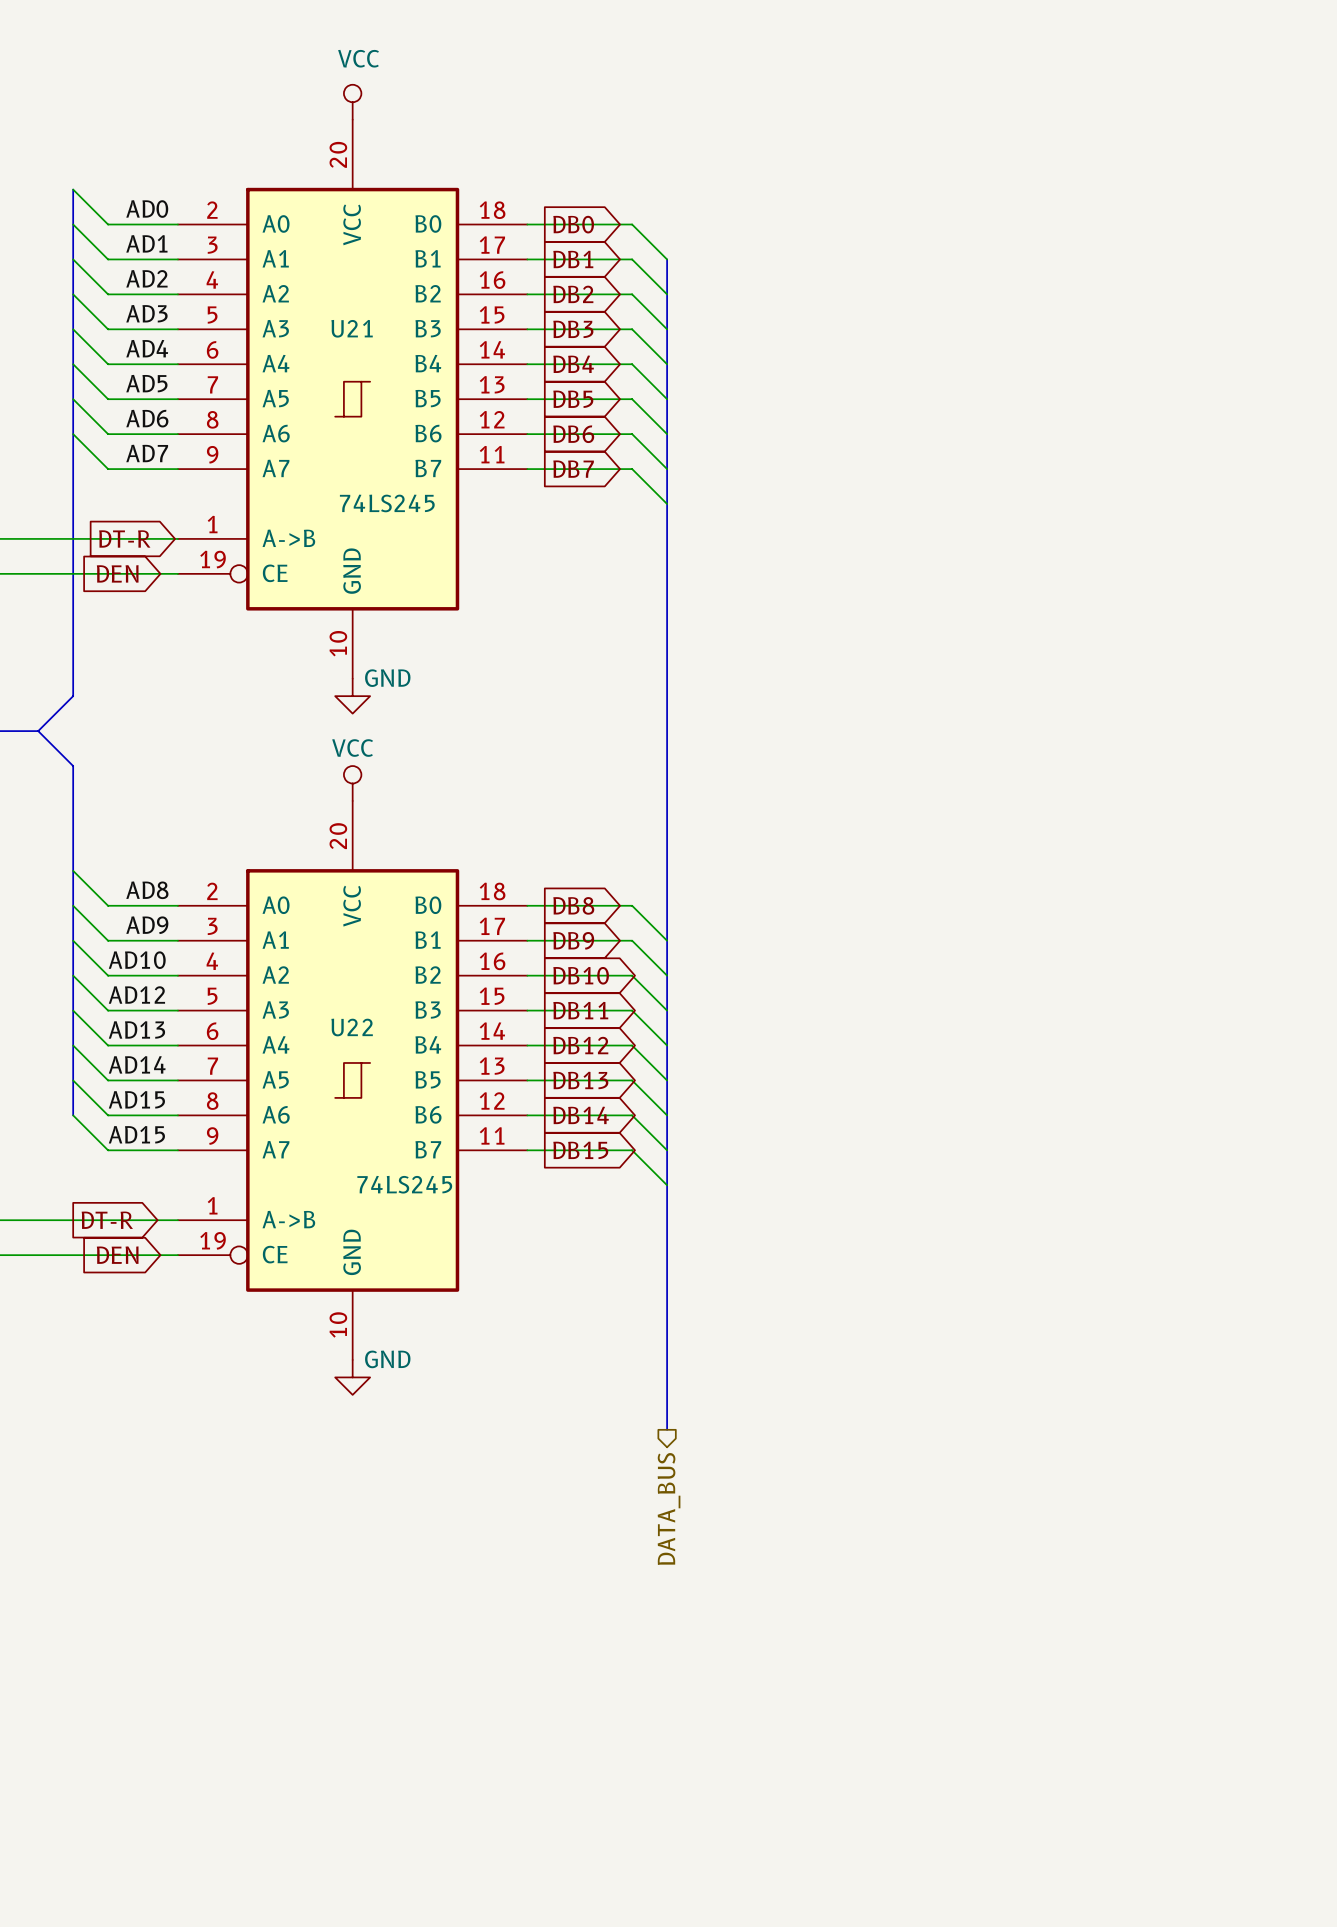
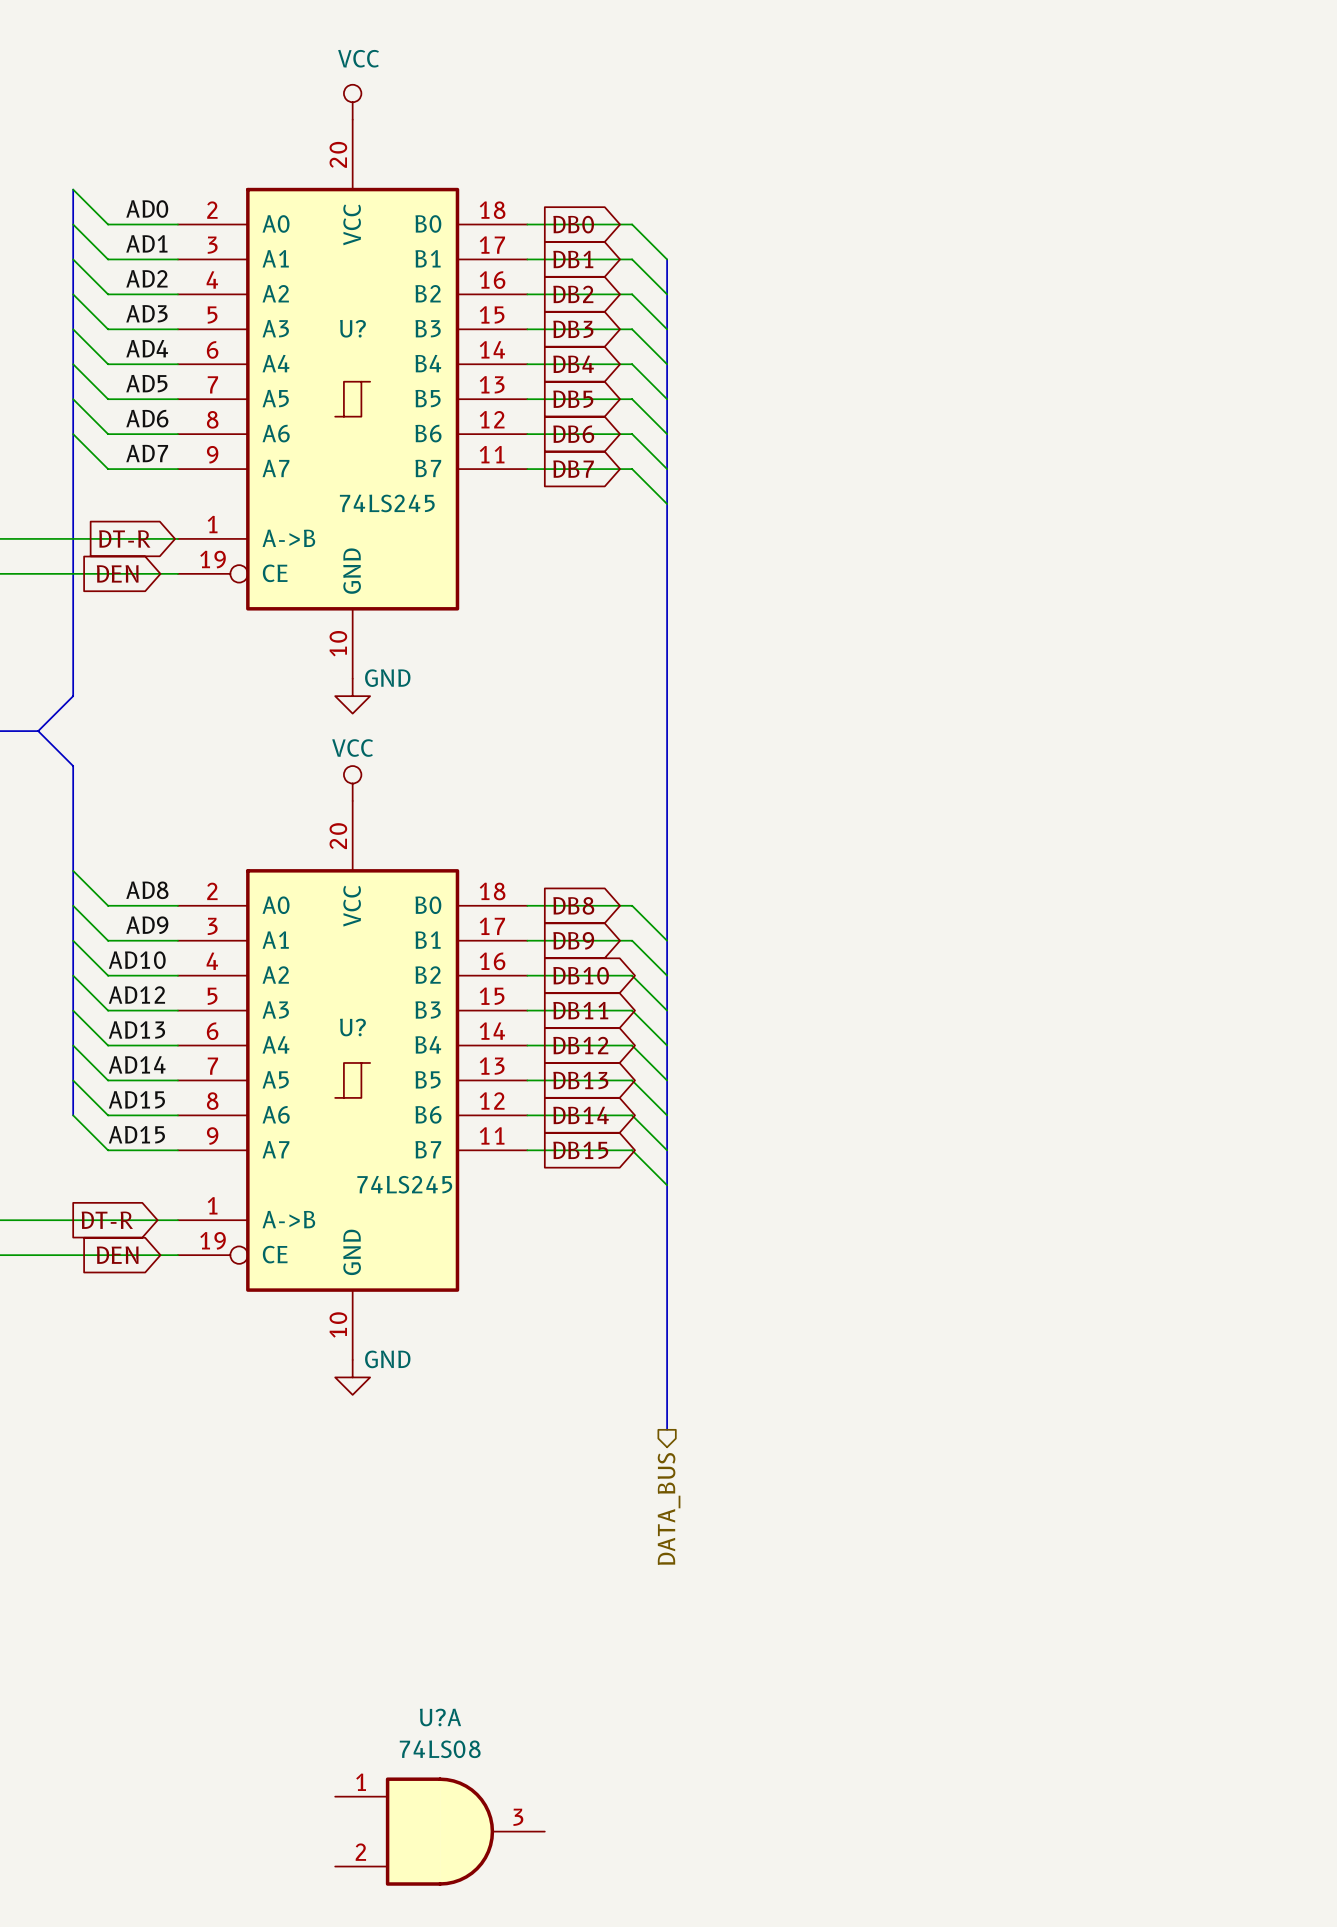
U21 name: U21 (352, 328) -> U? (352, 328)
U22 name: U22 (352, 1027) -> U? (352, 1027)
U?A: none -> 74LS08 (440, 1831)

